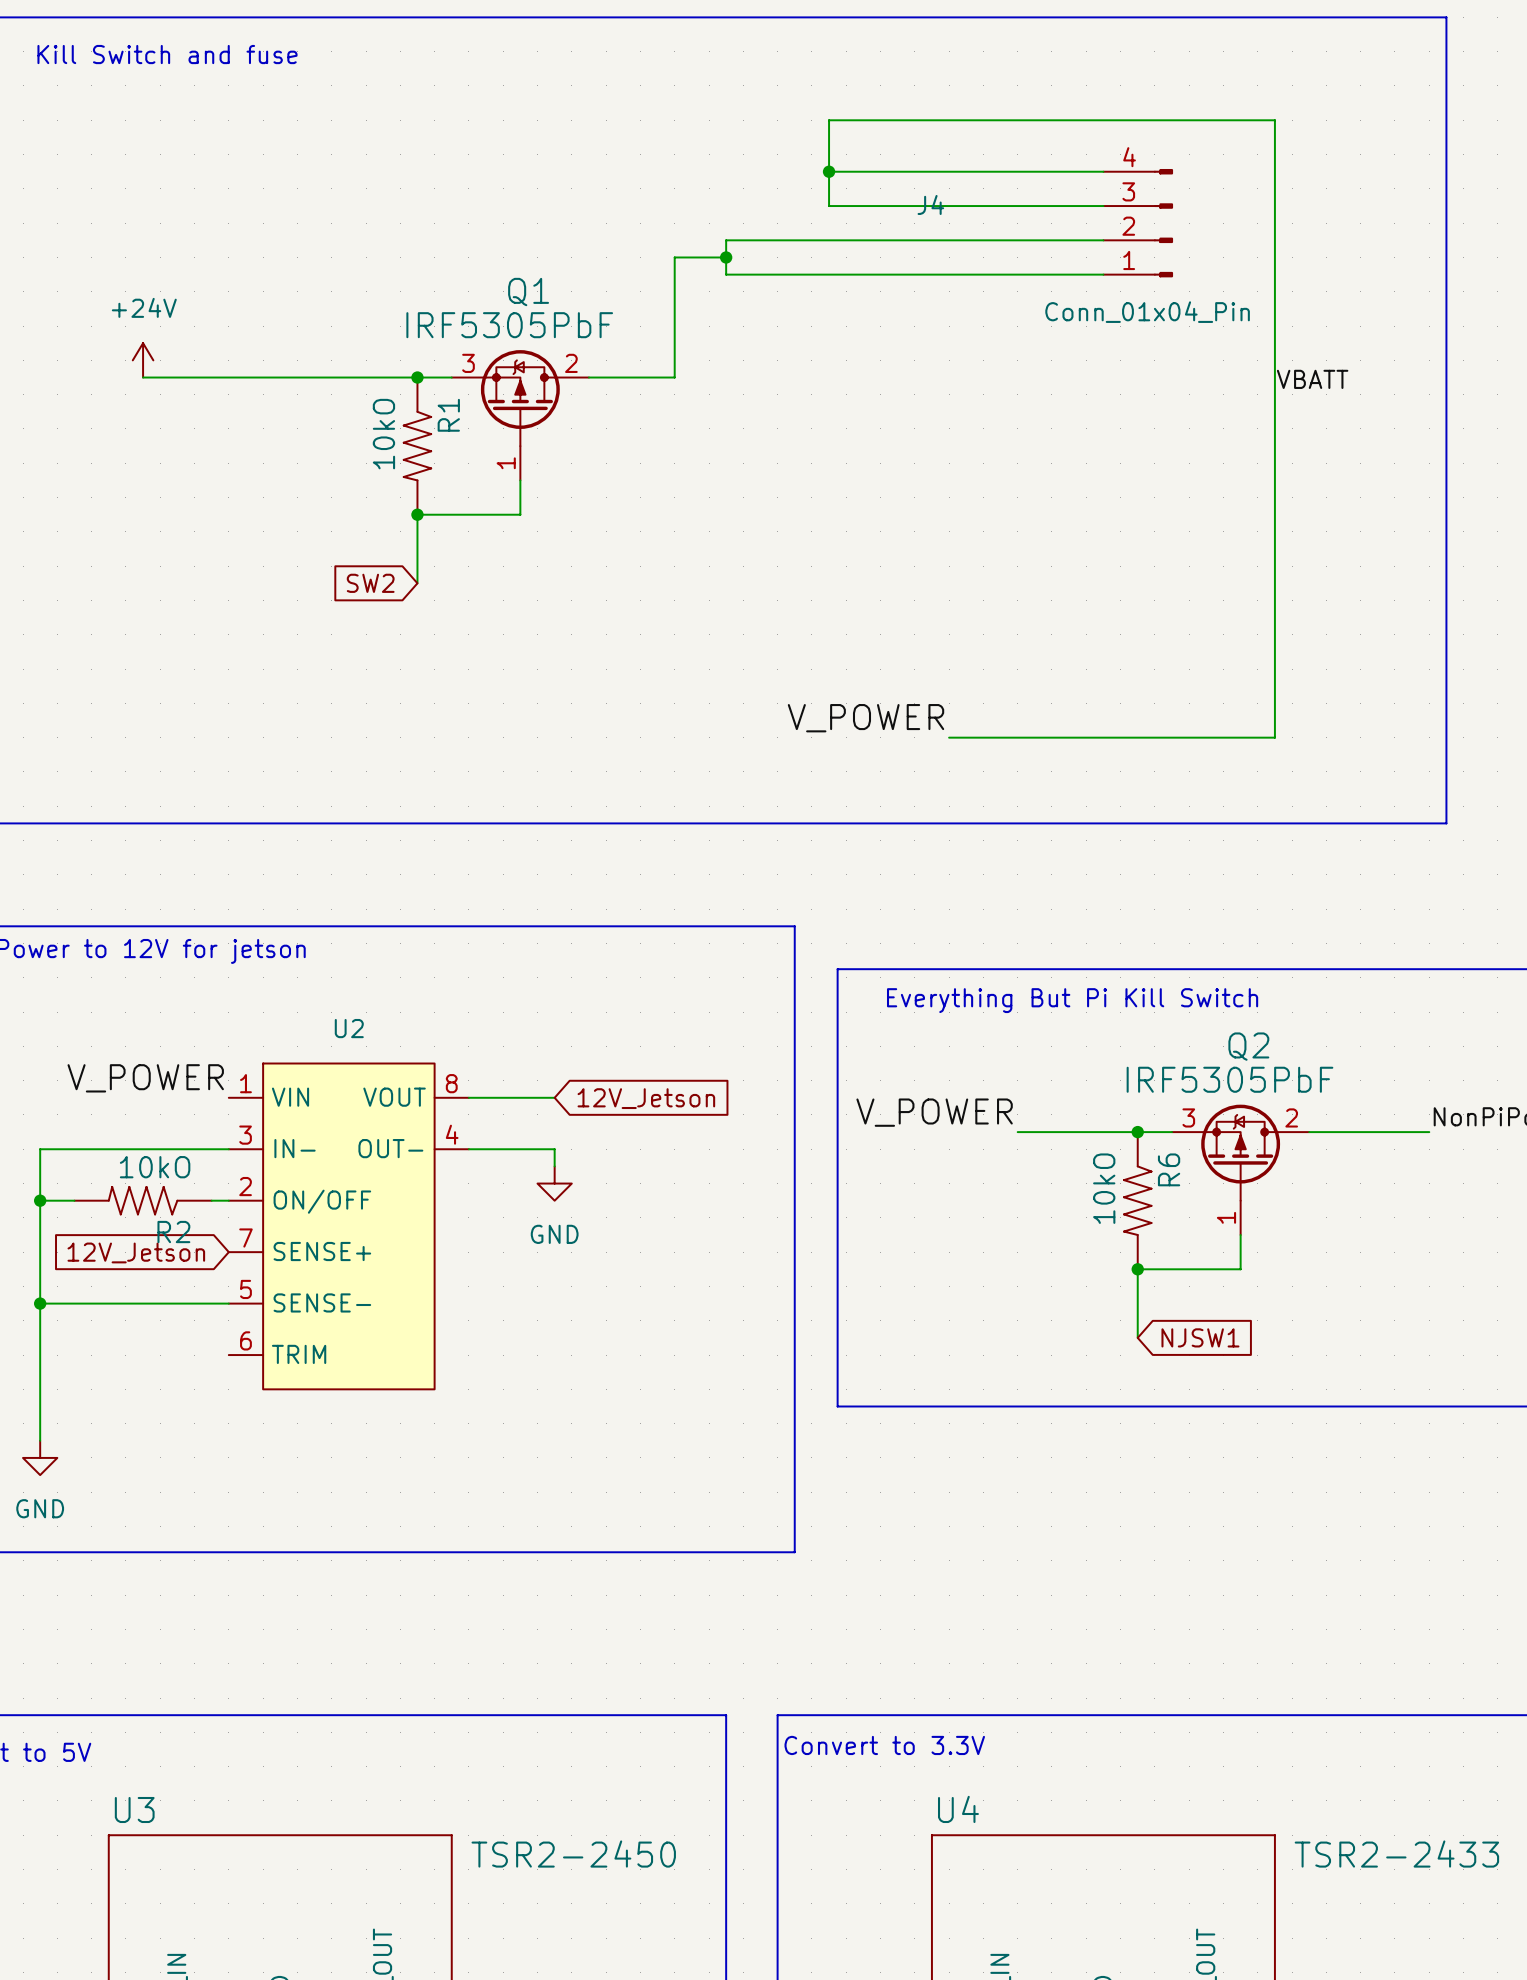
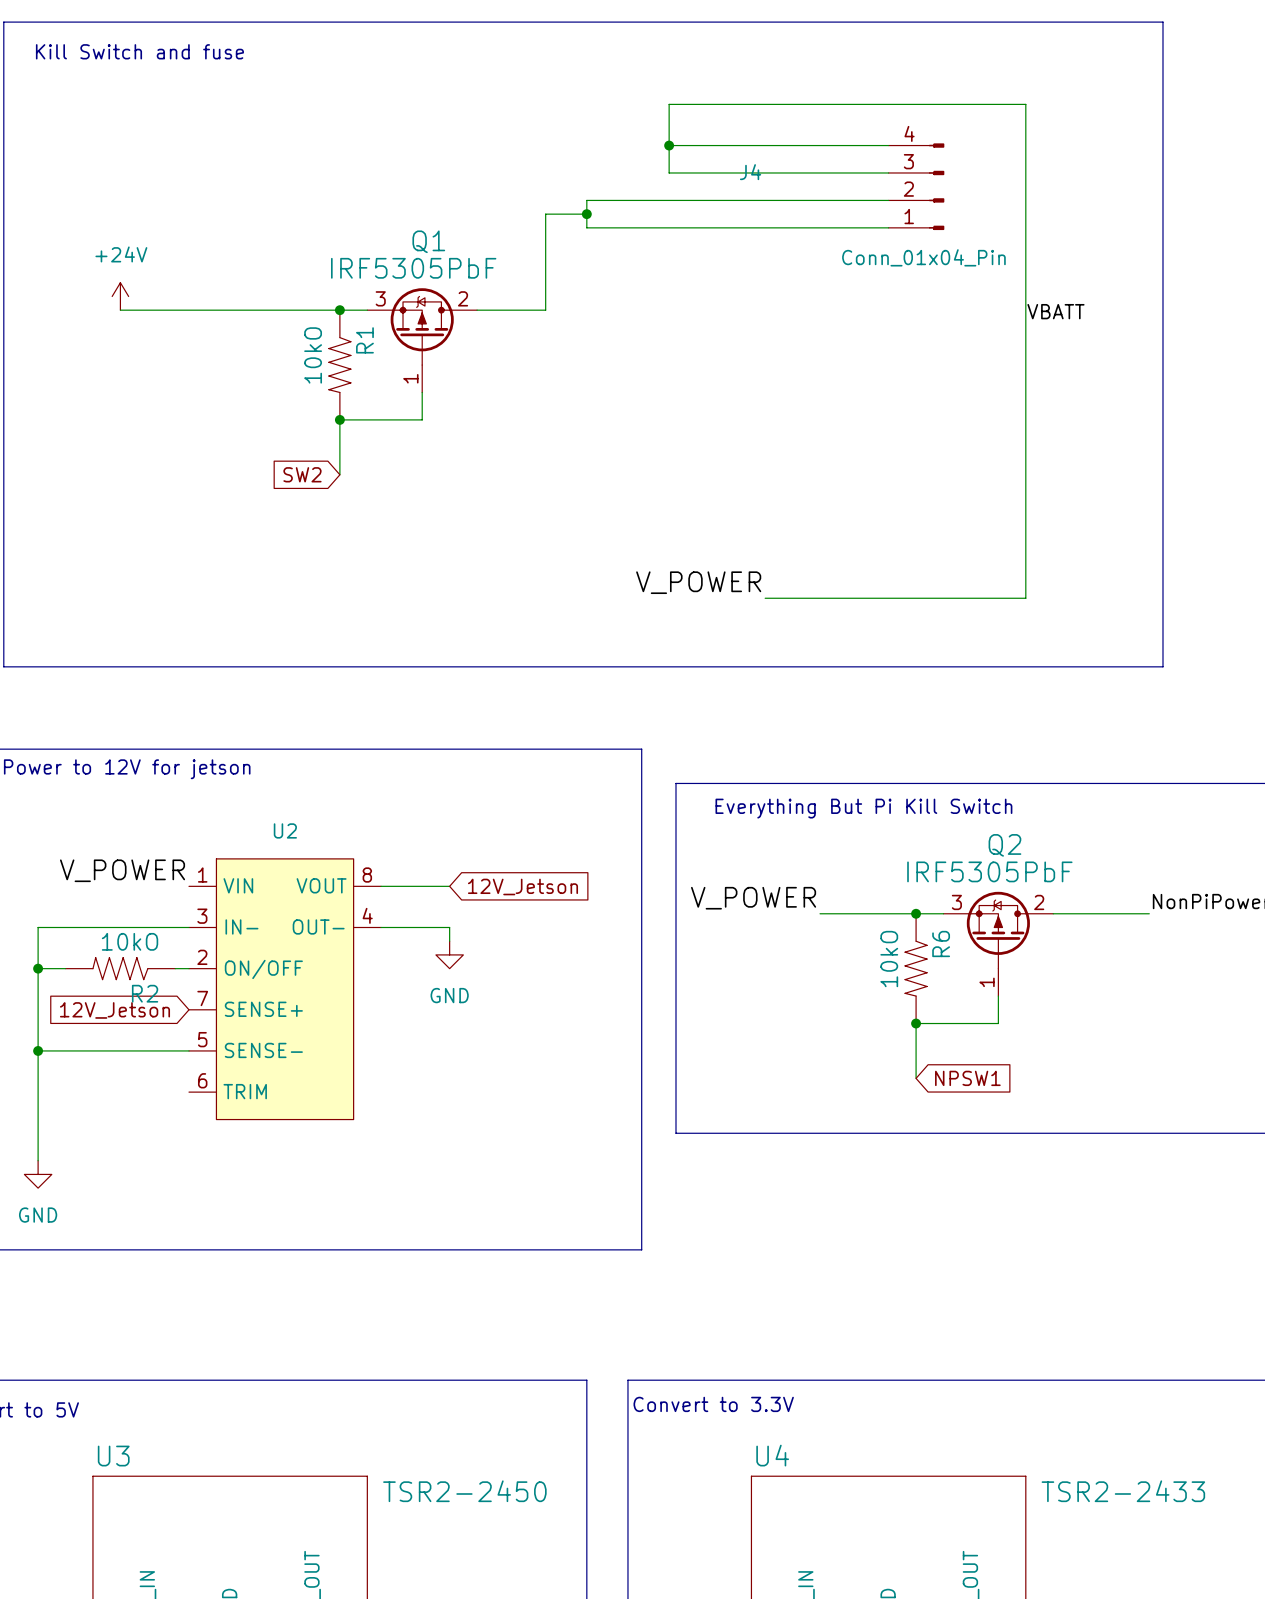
global label: NJSW1 (1200, 1337) -> NPSW1 (967, 1078)

